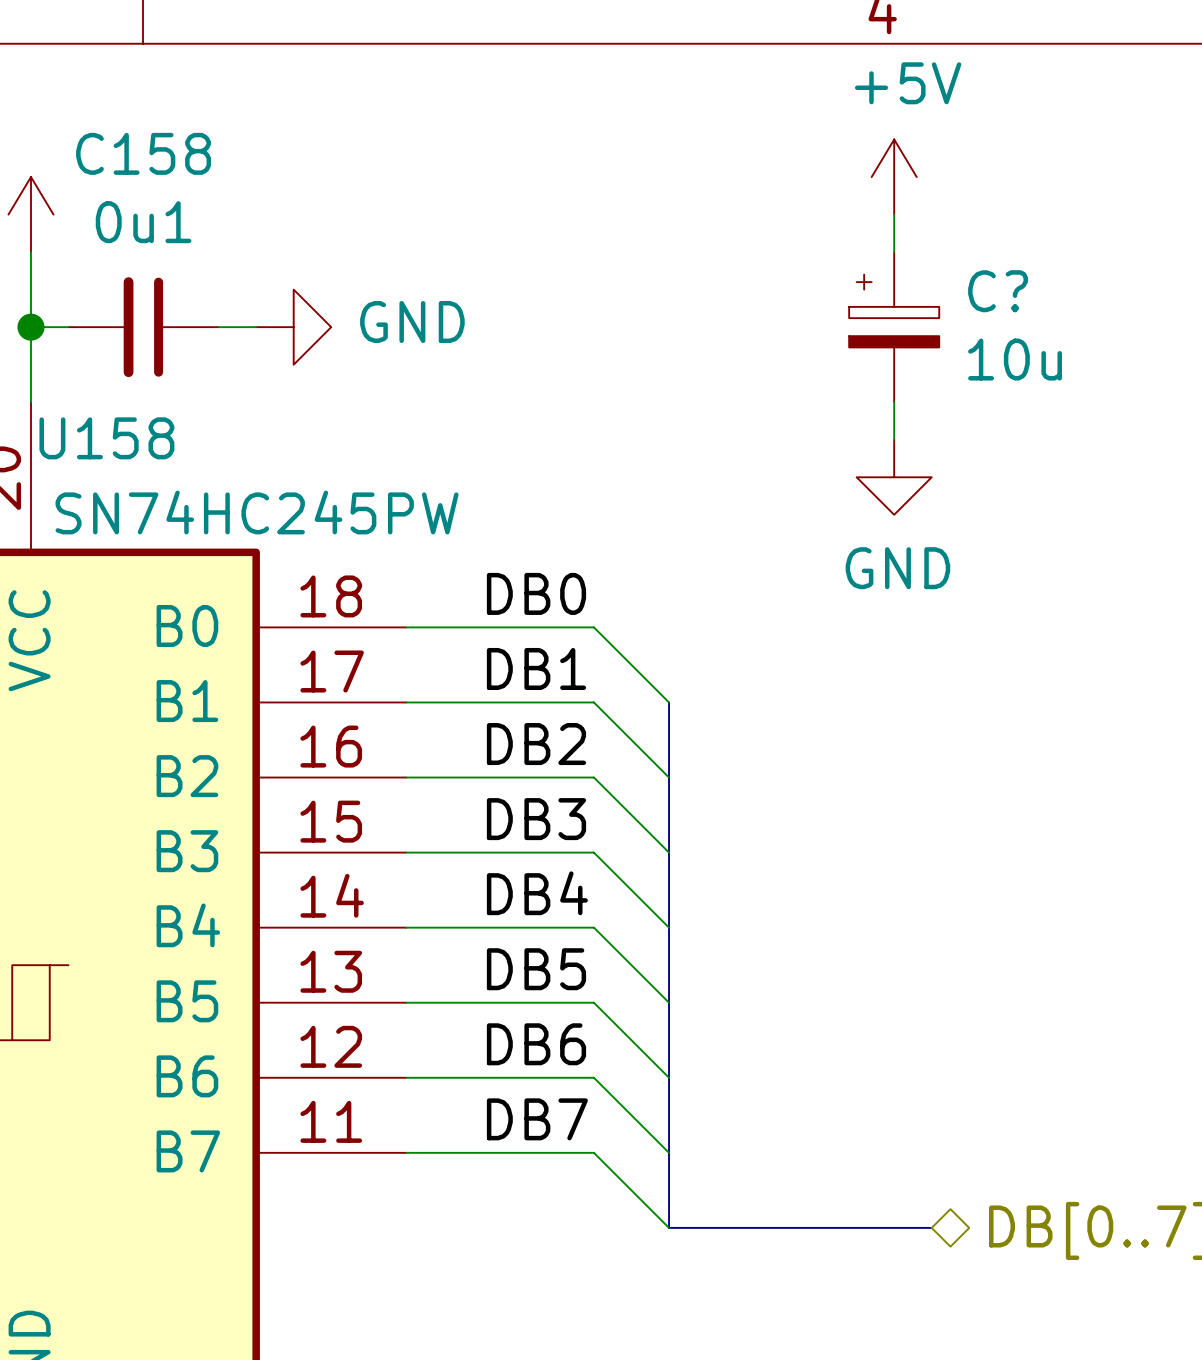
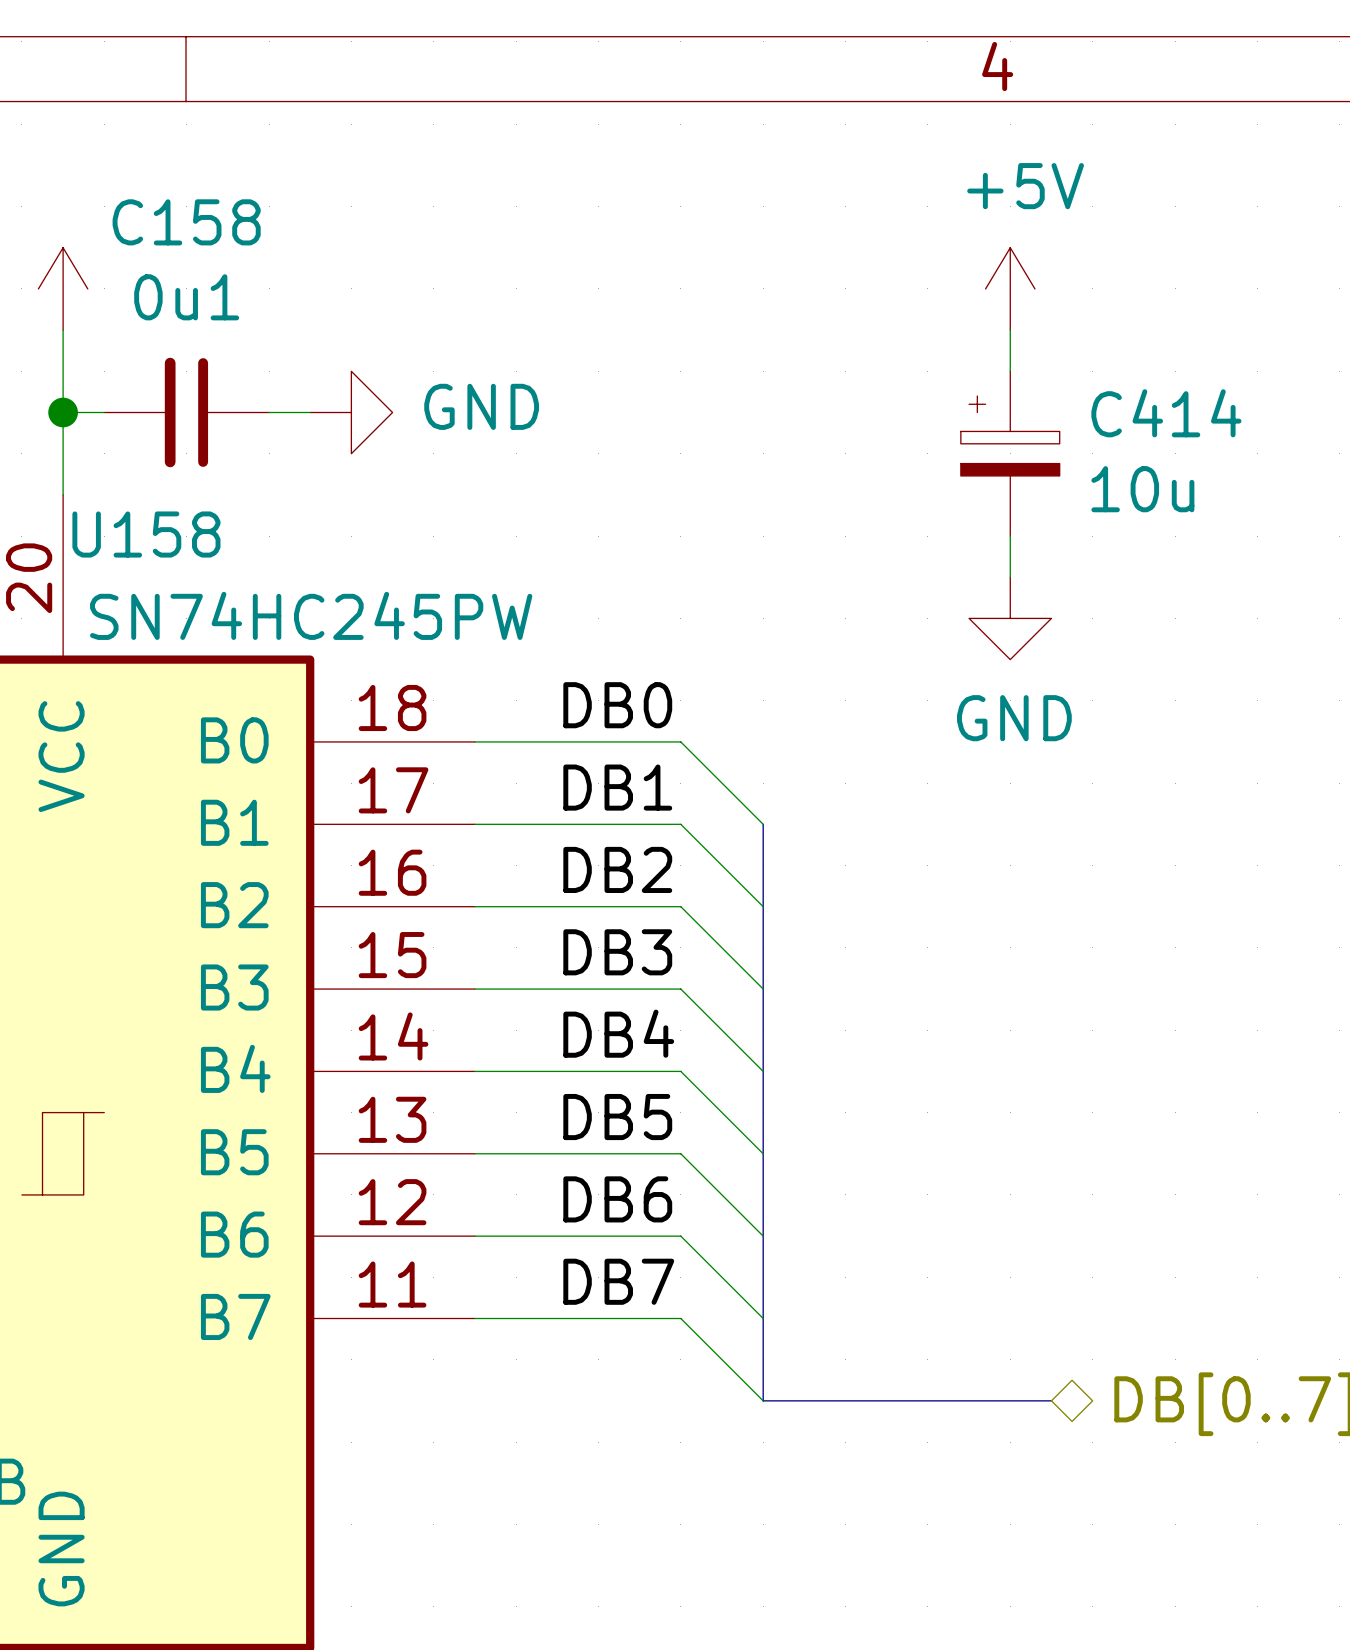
power symbol position: +5V (894, 177) -> +5V (1010, 288)
C?: 10u (894, 327) -> none
C414: none -> 10u (1010, 453)
power symbol position: GND (894, 477) -> GND (1010, 618)

